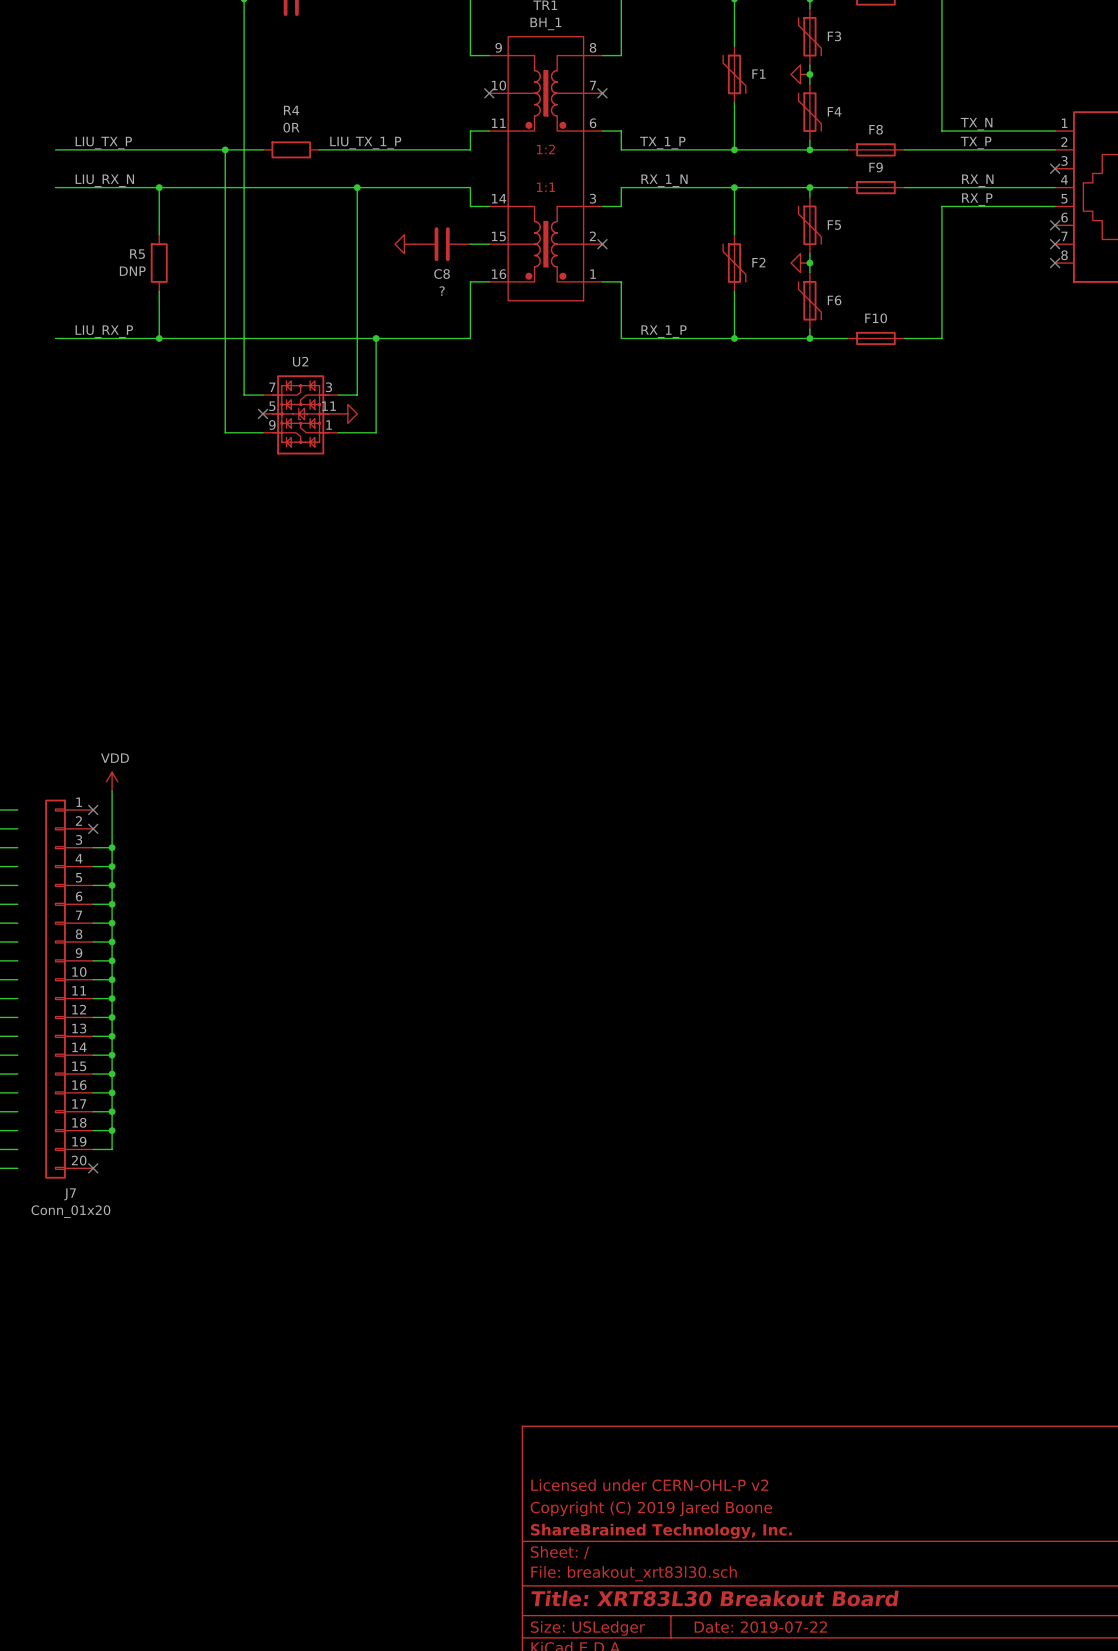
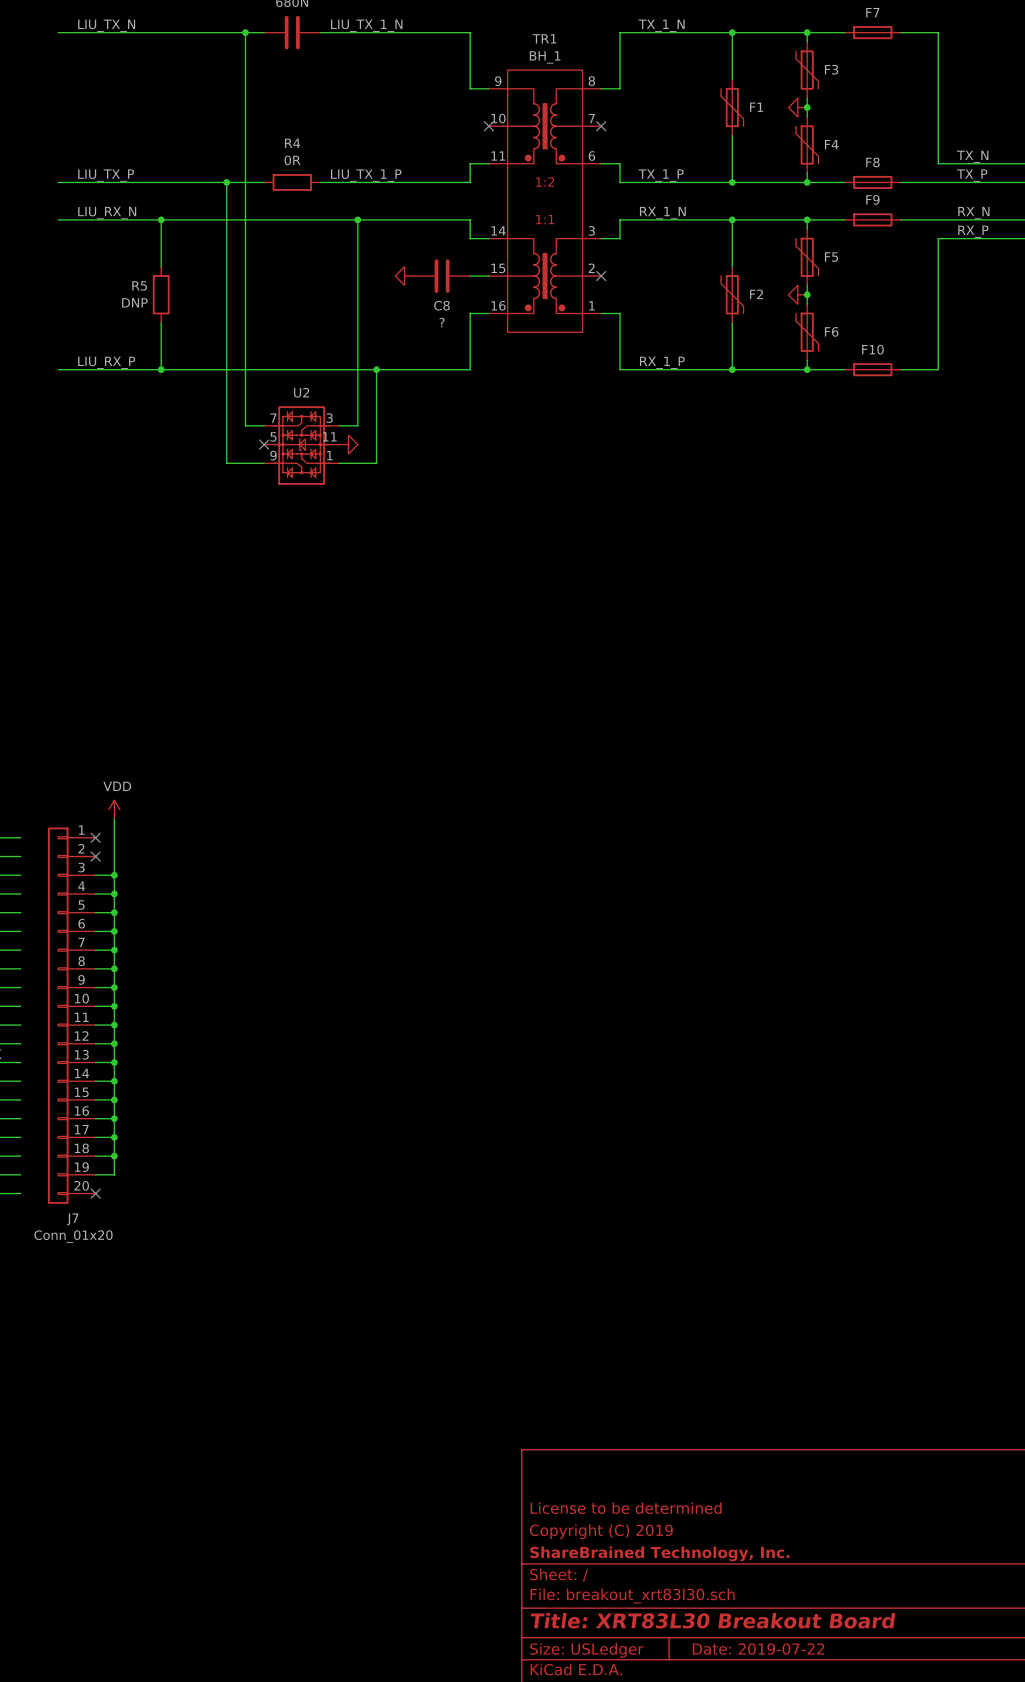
title block: Licensed under CERN-OHL-P v2 (649, 1485) -> License to be determined (626, 1508)
title block: Copyright (C) 2019 Jared Boone (651, 1508) -> Copyright (C) 2019 (601, 1531)

